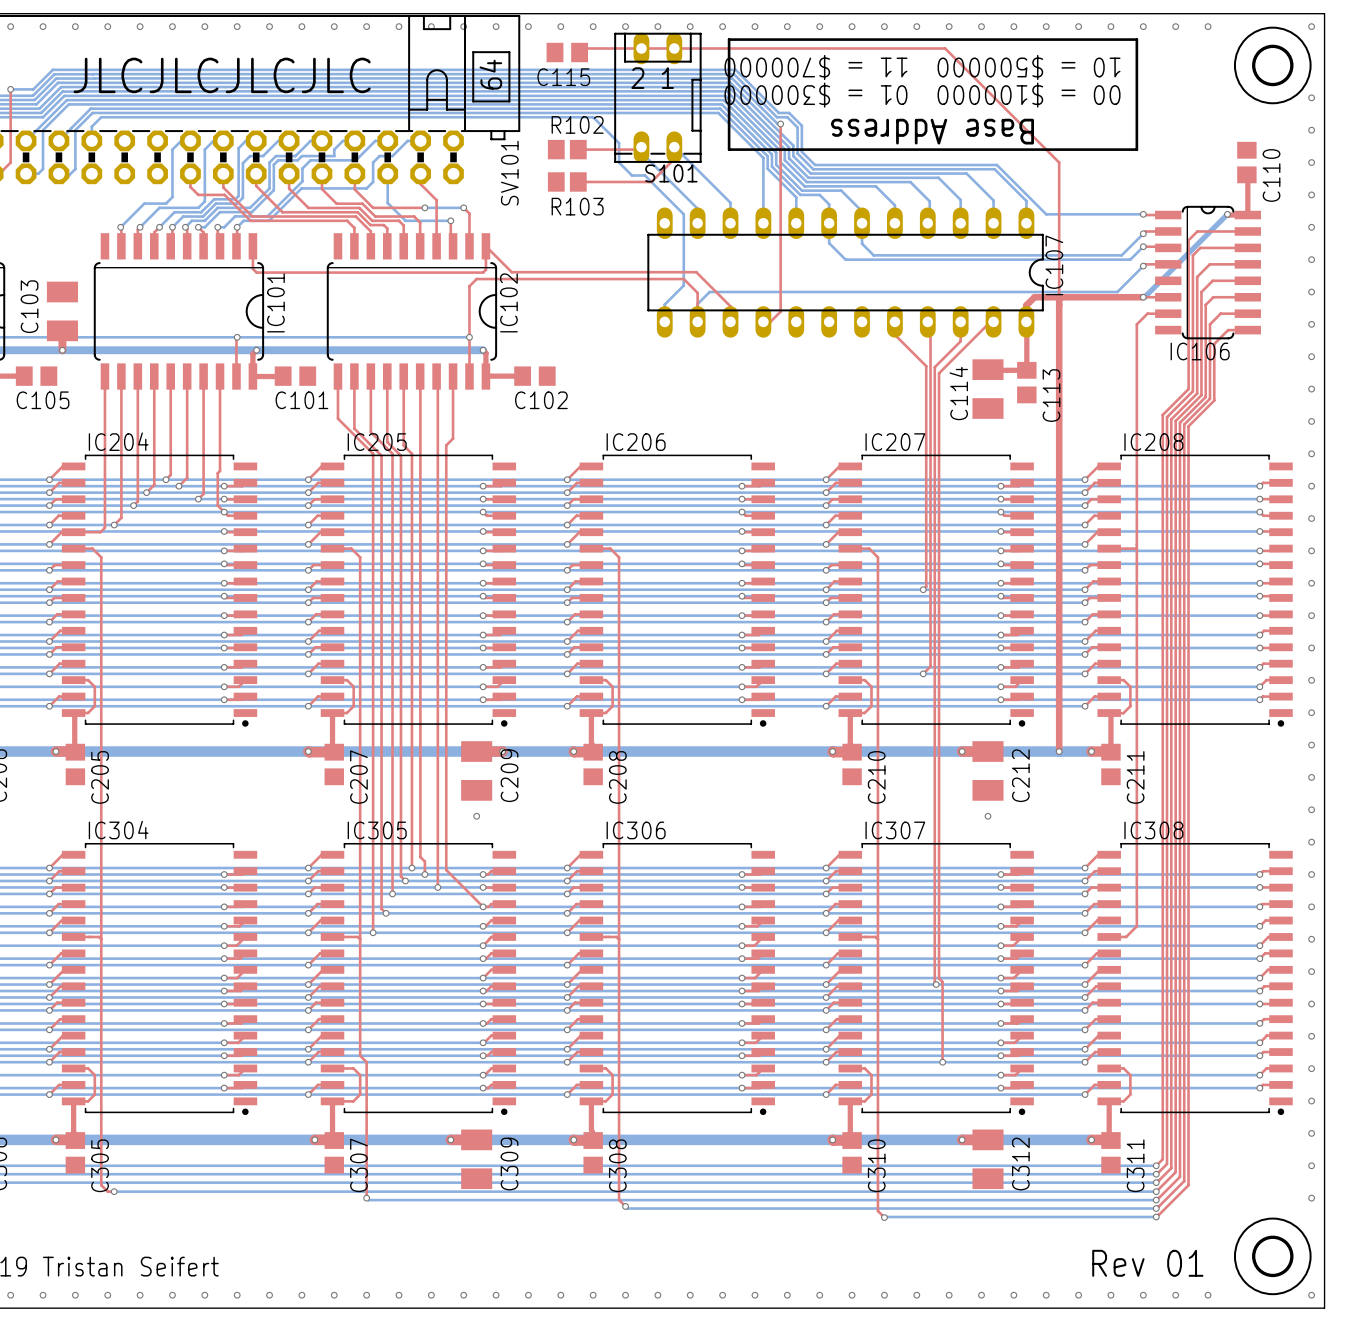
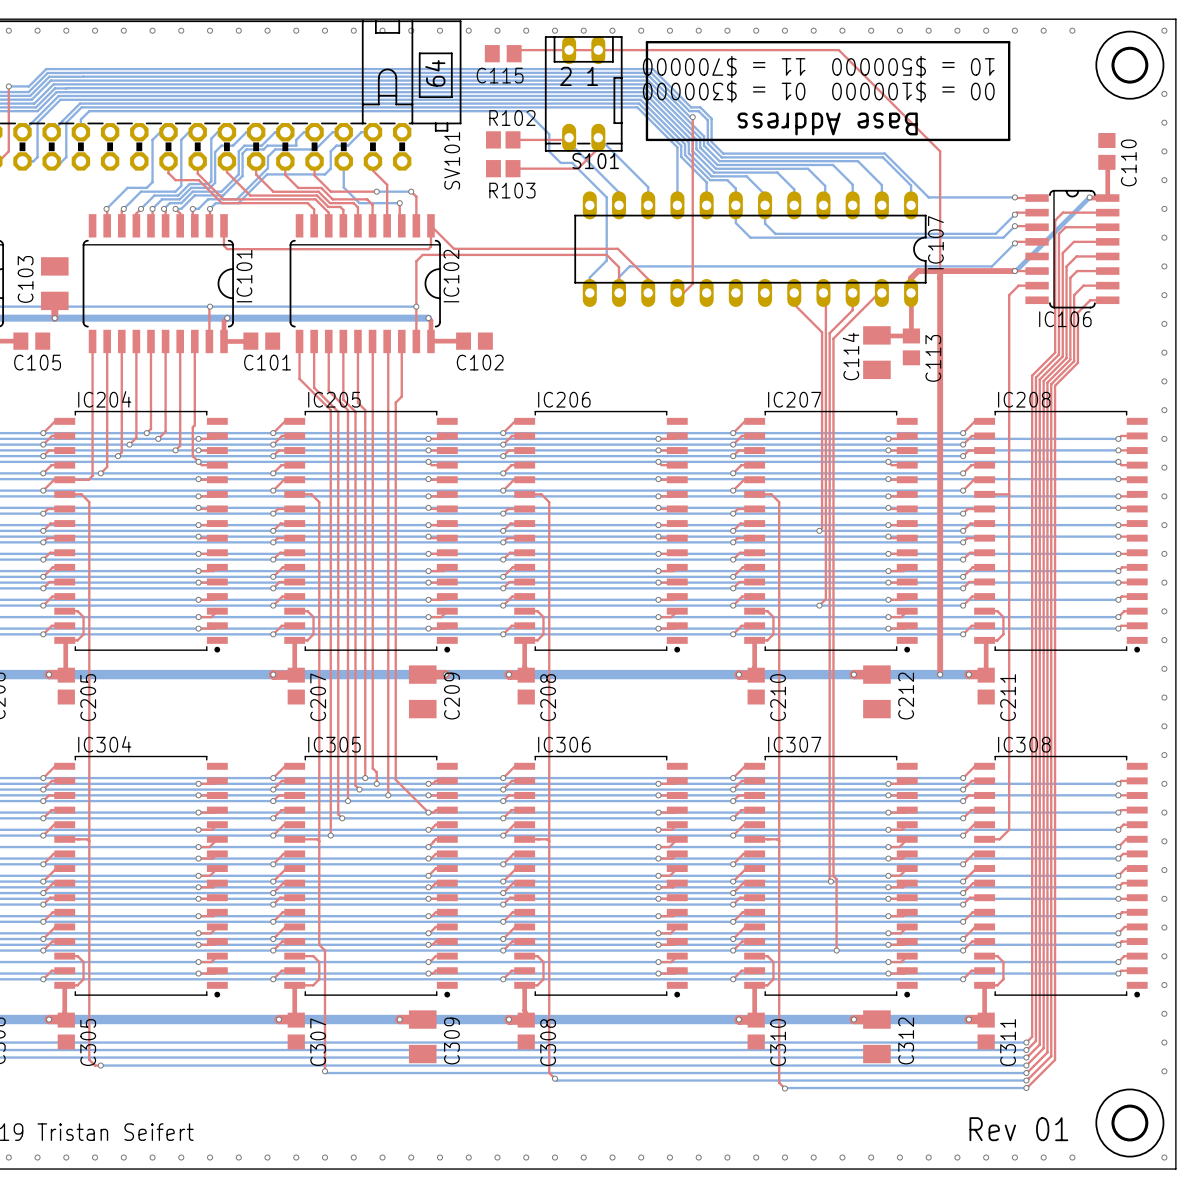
text: JLCJLCJLCJLC (222, 75) -> none
via: (476, 816) -> none
via: (987, 816) -> none

